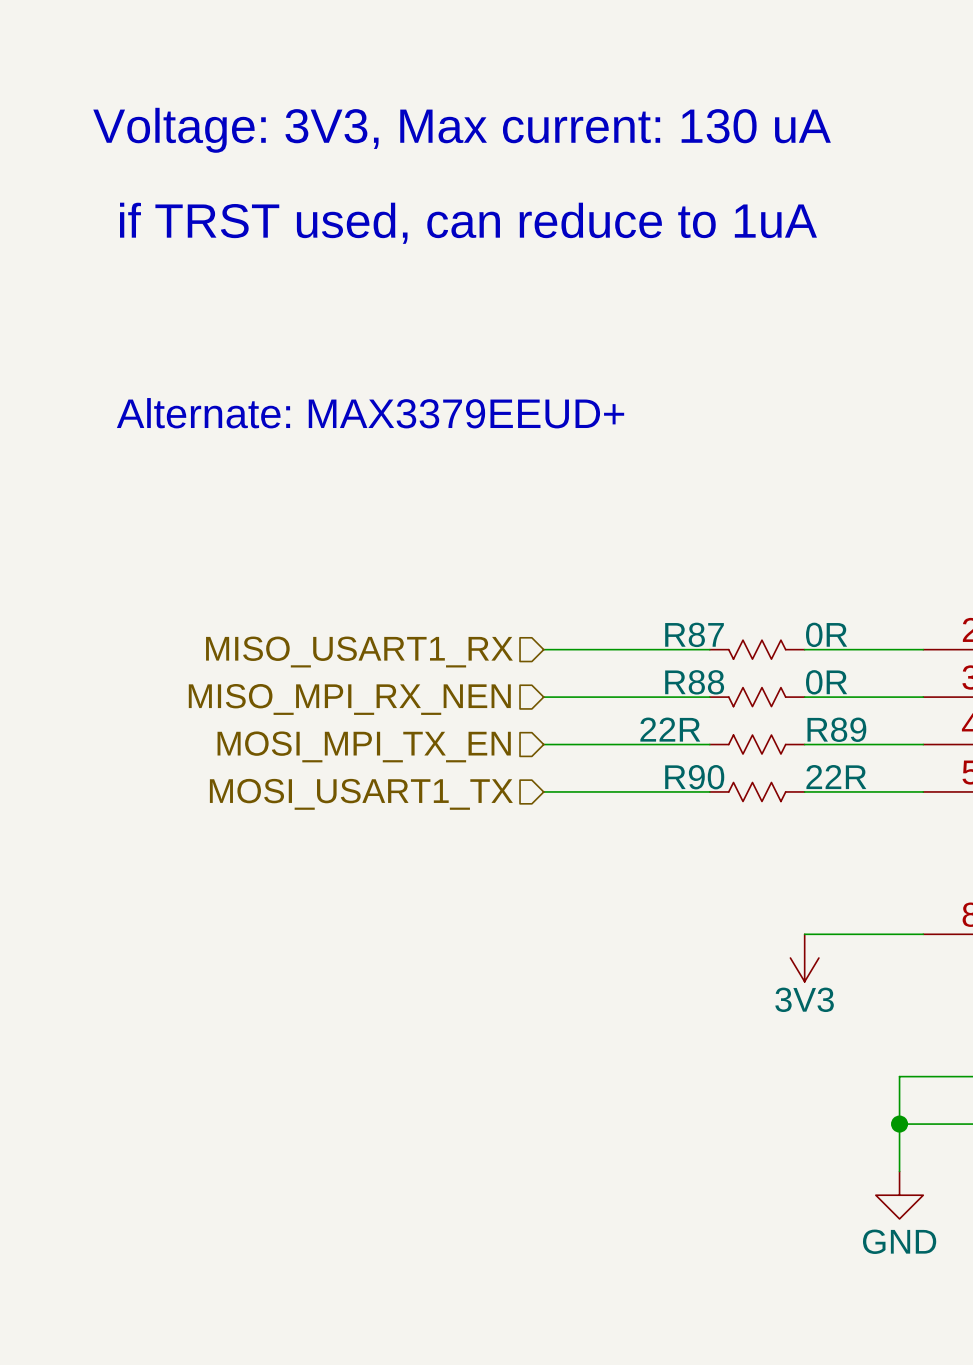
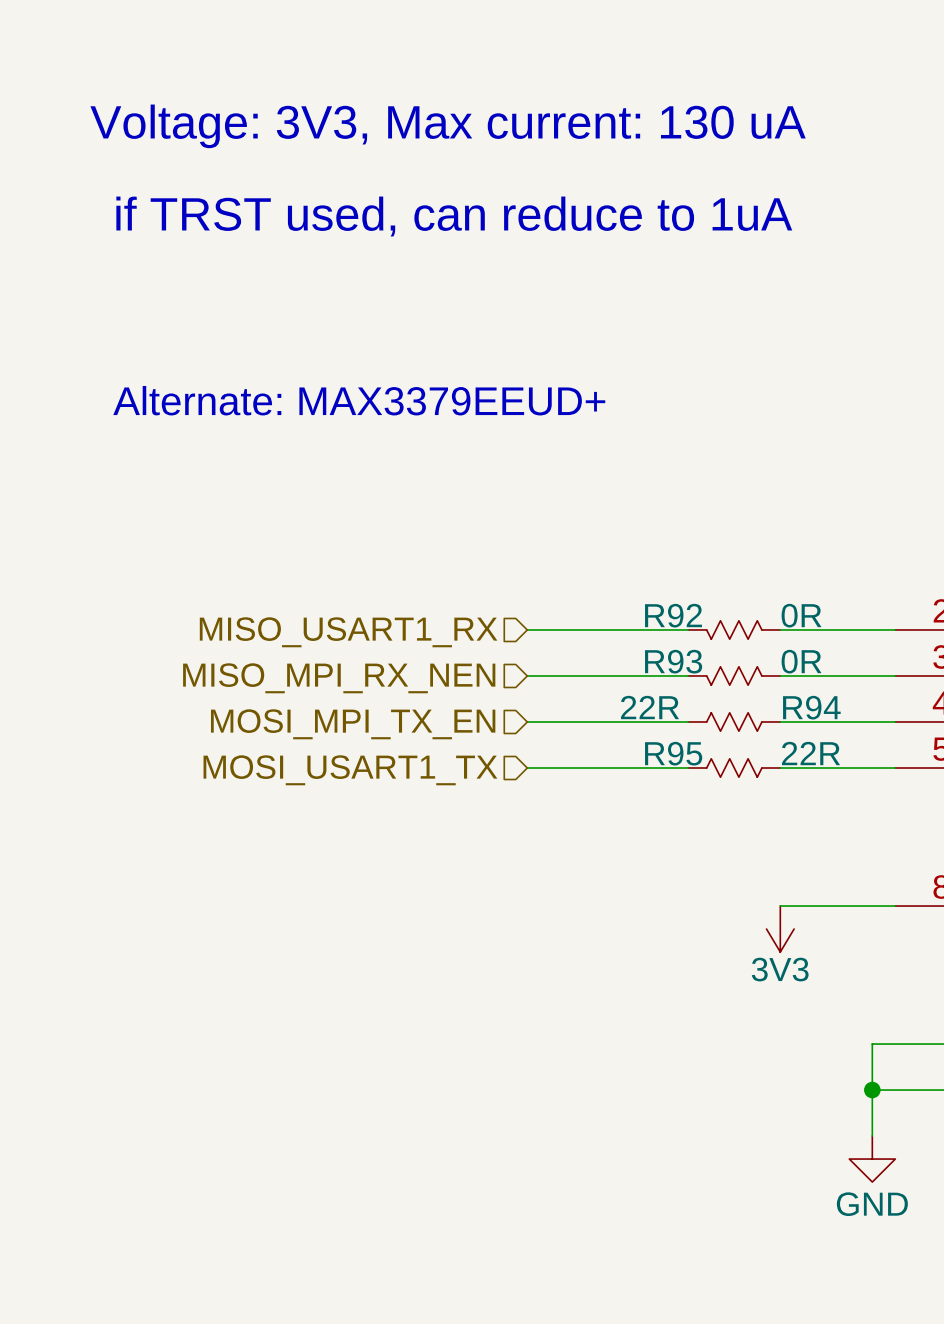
R87 name: R87 (694, 634) -> R92 (673, 615)
R88 name: R88 (694, 682) -> R93 (673, 661)
R89 name: R89 (836, 729) -> R94 (811, 707)
R90 name: R90 (694, 777) -> R95 (673, 753)

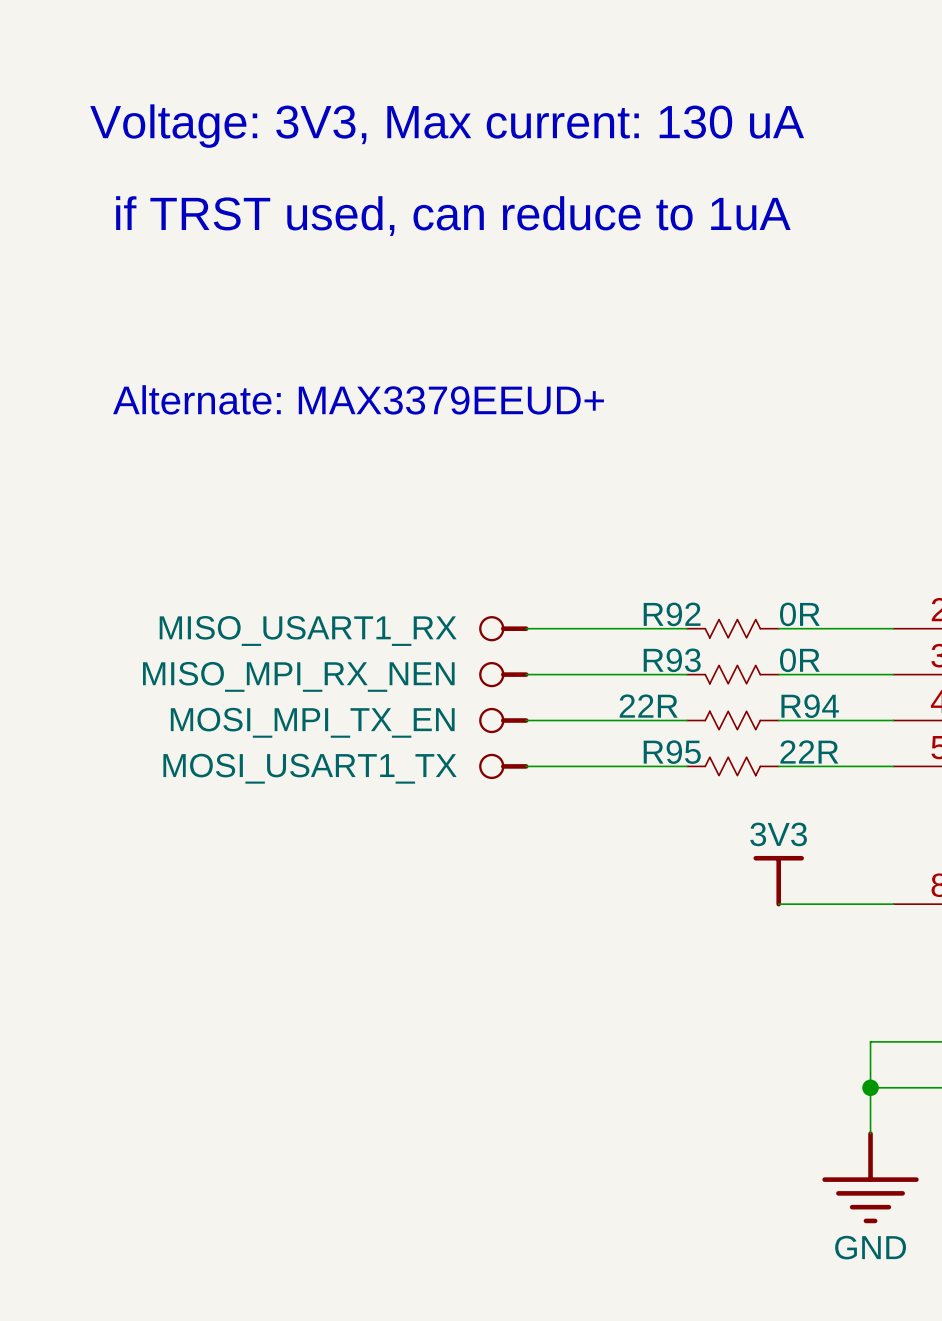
power symbol: none -> MISO_USART1_RX (503, 628)
hierarchical label: MISO_USART1_RX (348, 632) -> none
power symbol: none -> MISO_MPI_RX_NEN (503, 674)
hierarchical label: MISO_MPI_RX_NEN (339, 678) -> none
power symbol: none -> MOSI_MPI_TX_EN (503, 720)
hierarchical label: MOSI_MPI_TX_EN (353, 724) -> none
power symbol: none -> MOSI_USART1_TX (503, 766)
hierarchical label: MOSI_USART1_TX (350, 770) -> none
power symbol: none -> 3V3 (778, 881)
power symbol: 3V3 (780, 929) -> none
power symbol: GND (872, 1159) -> none
power symbol: none -> GND (870, 1177)

